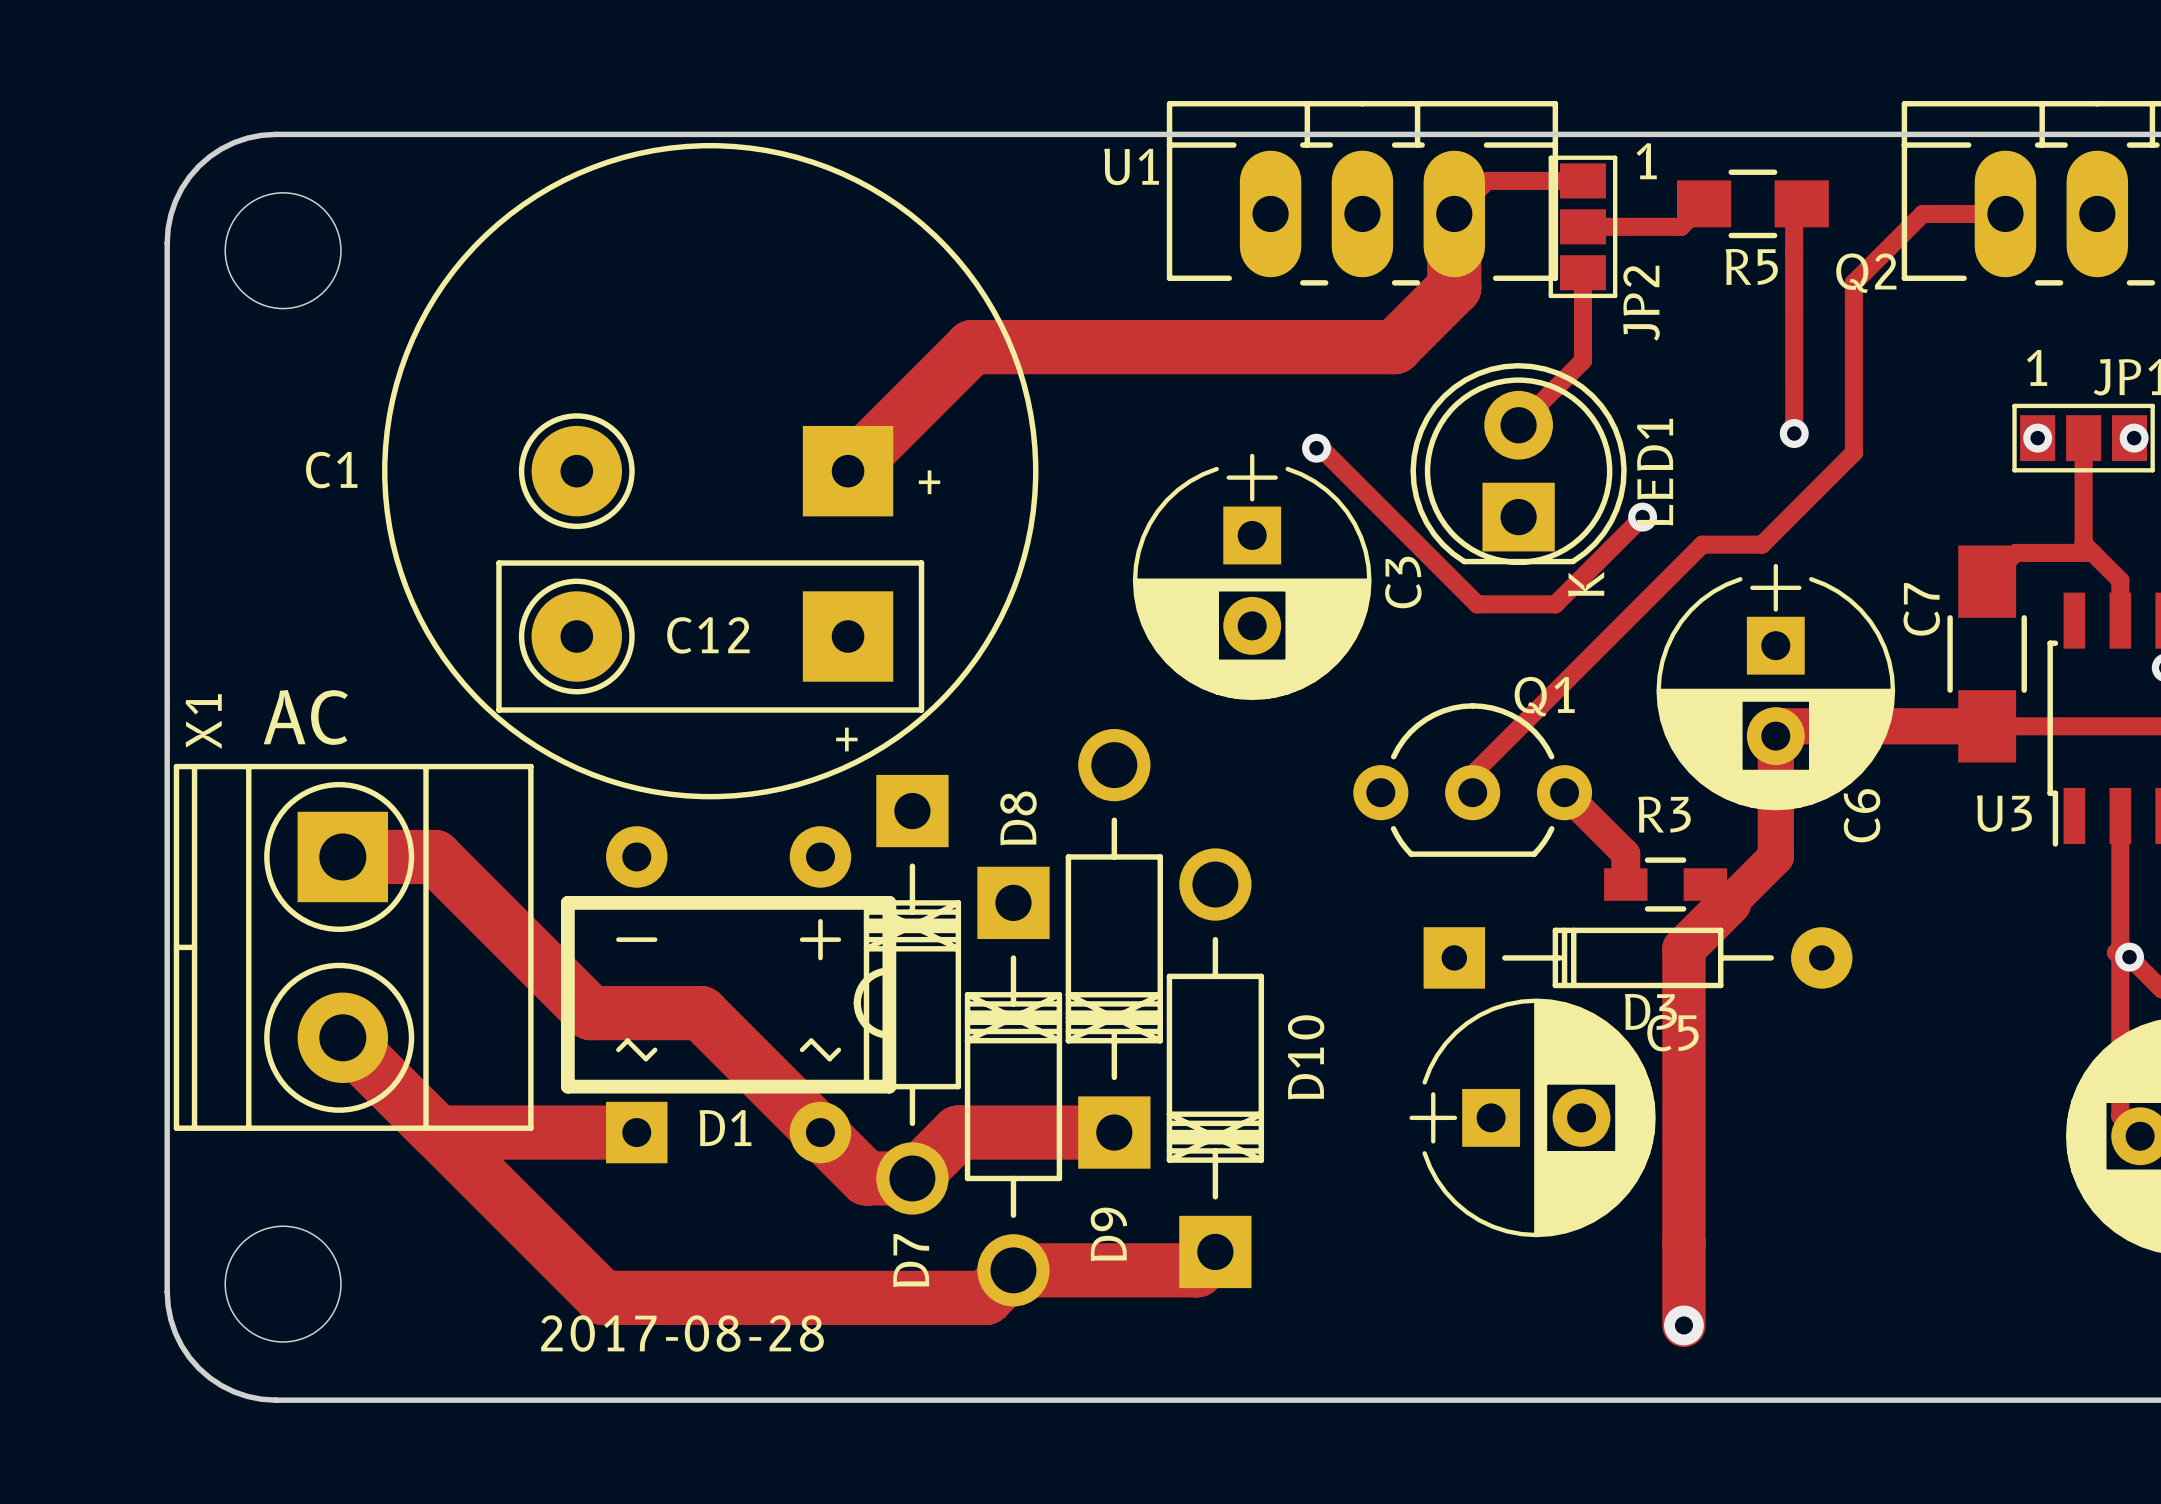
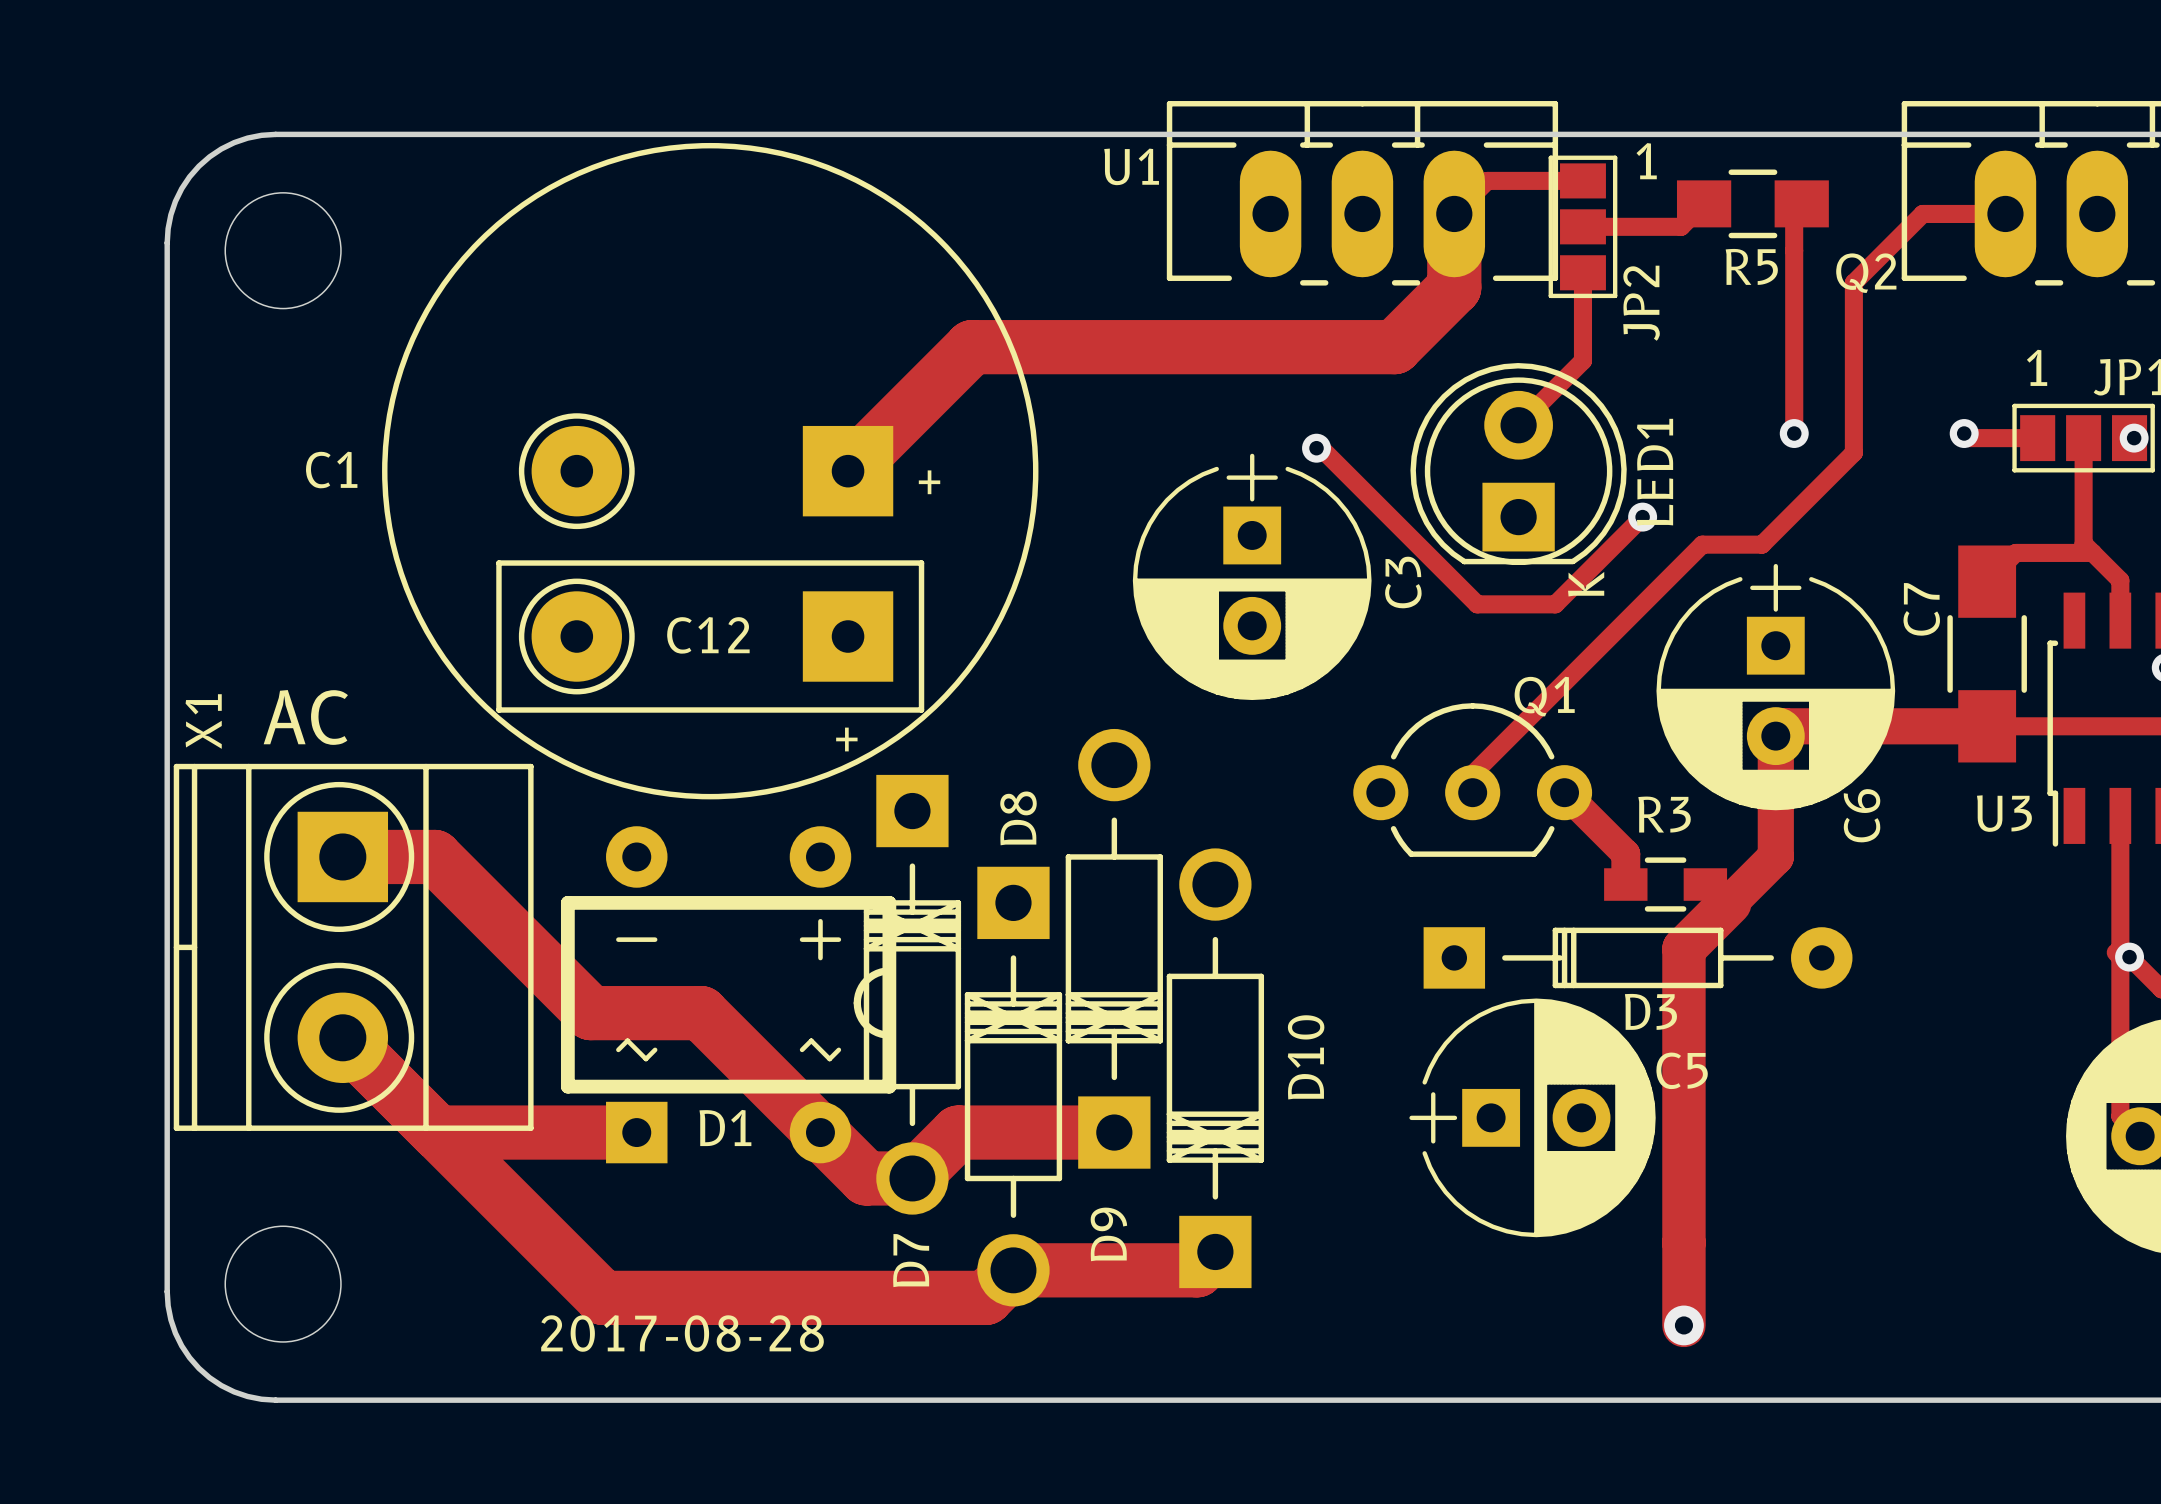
track: none -> (1964, 433) (1968, 438) (2037, 438)
via position: (2037, 438) -> (1964, 433)
C5 name position: C5 (1672, 1033) -> C5 (1682, 1070)

